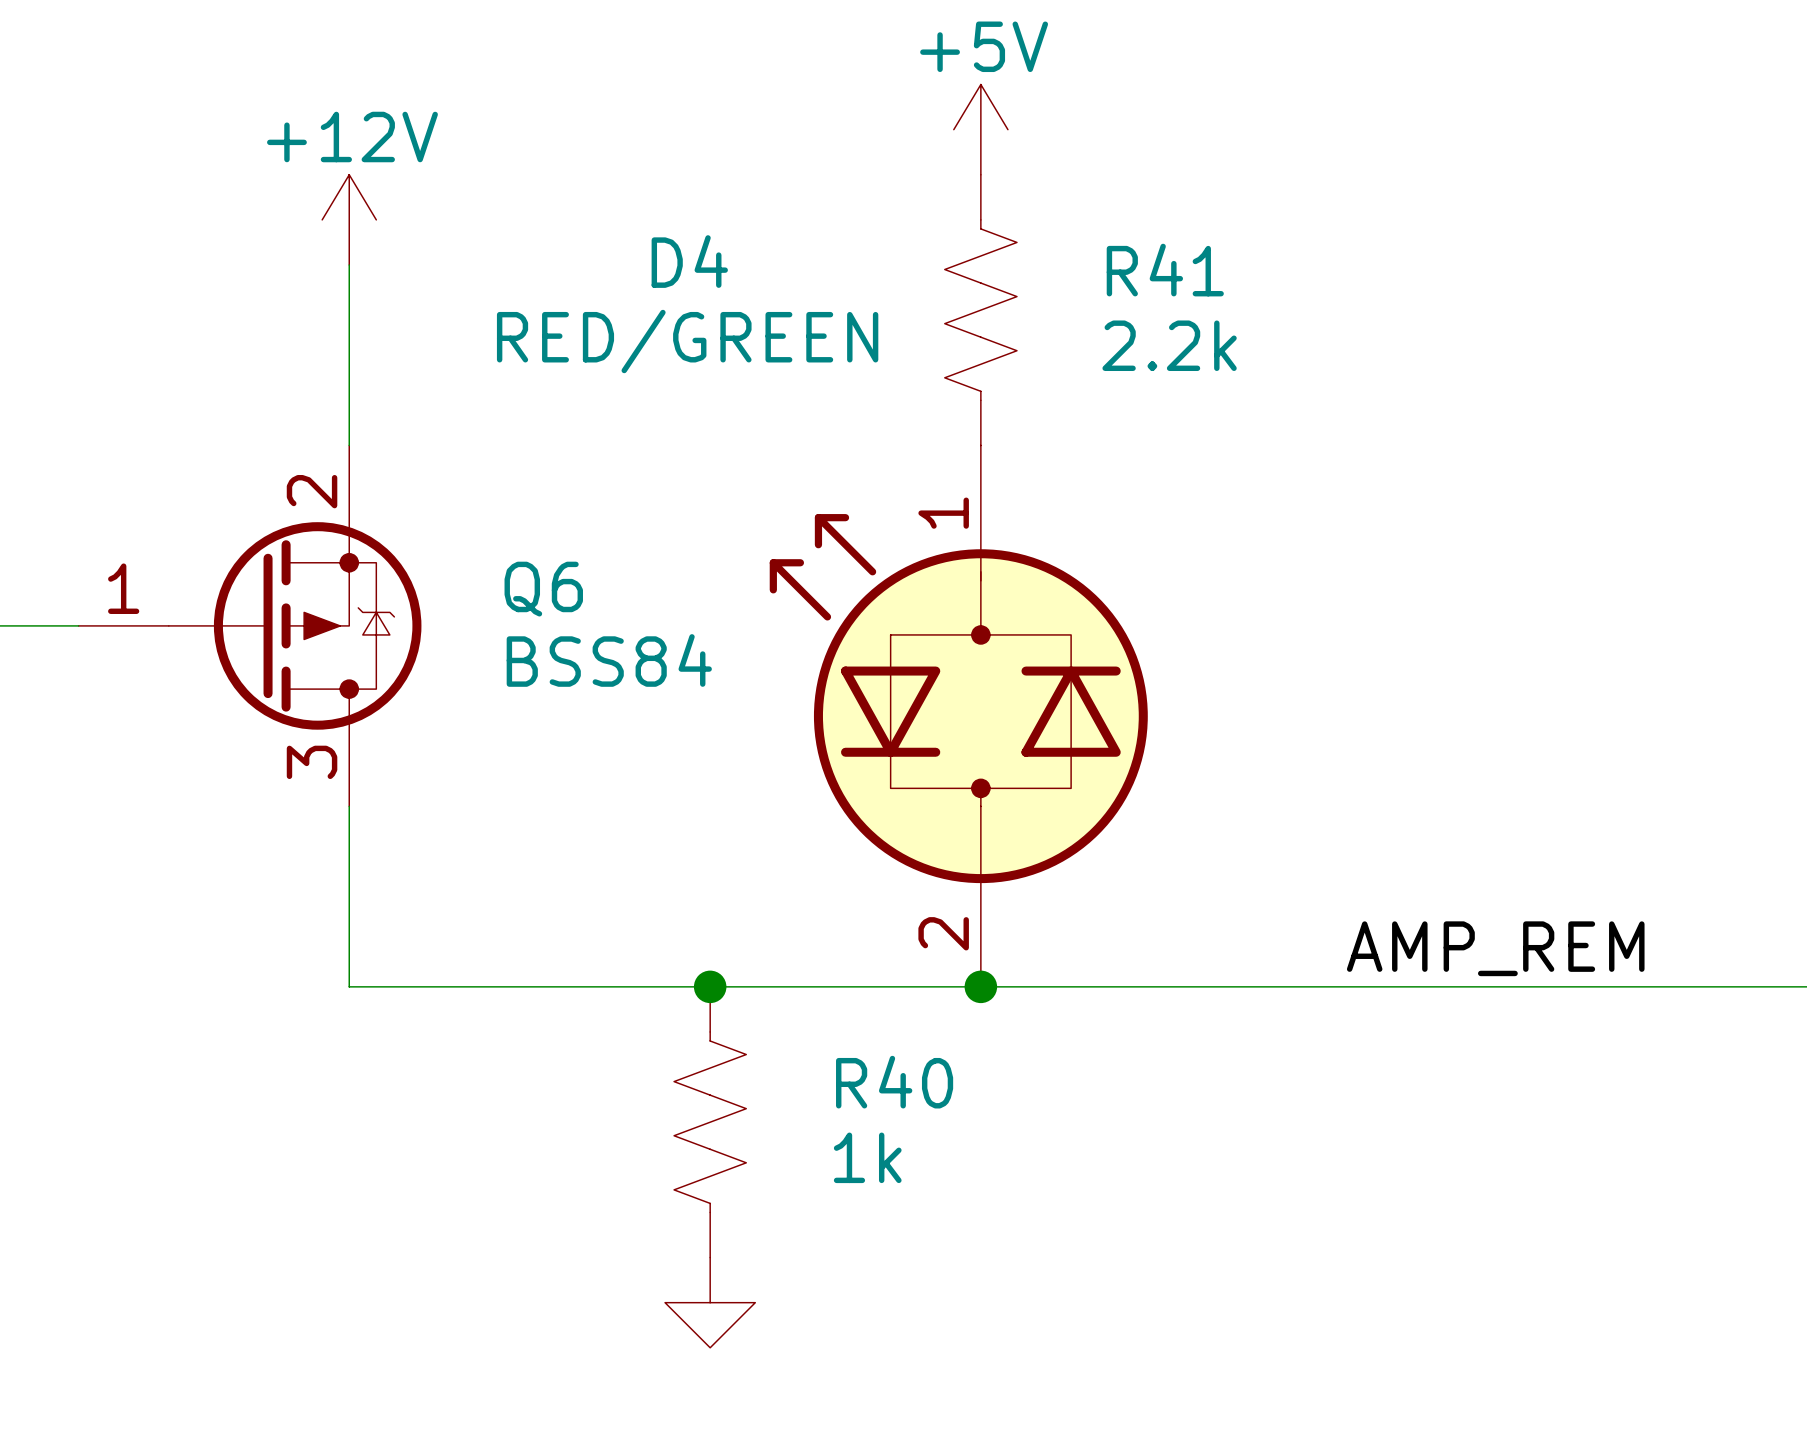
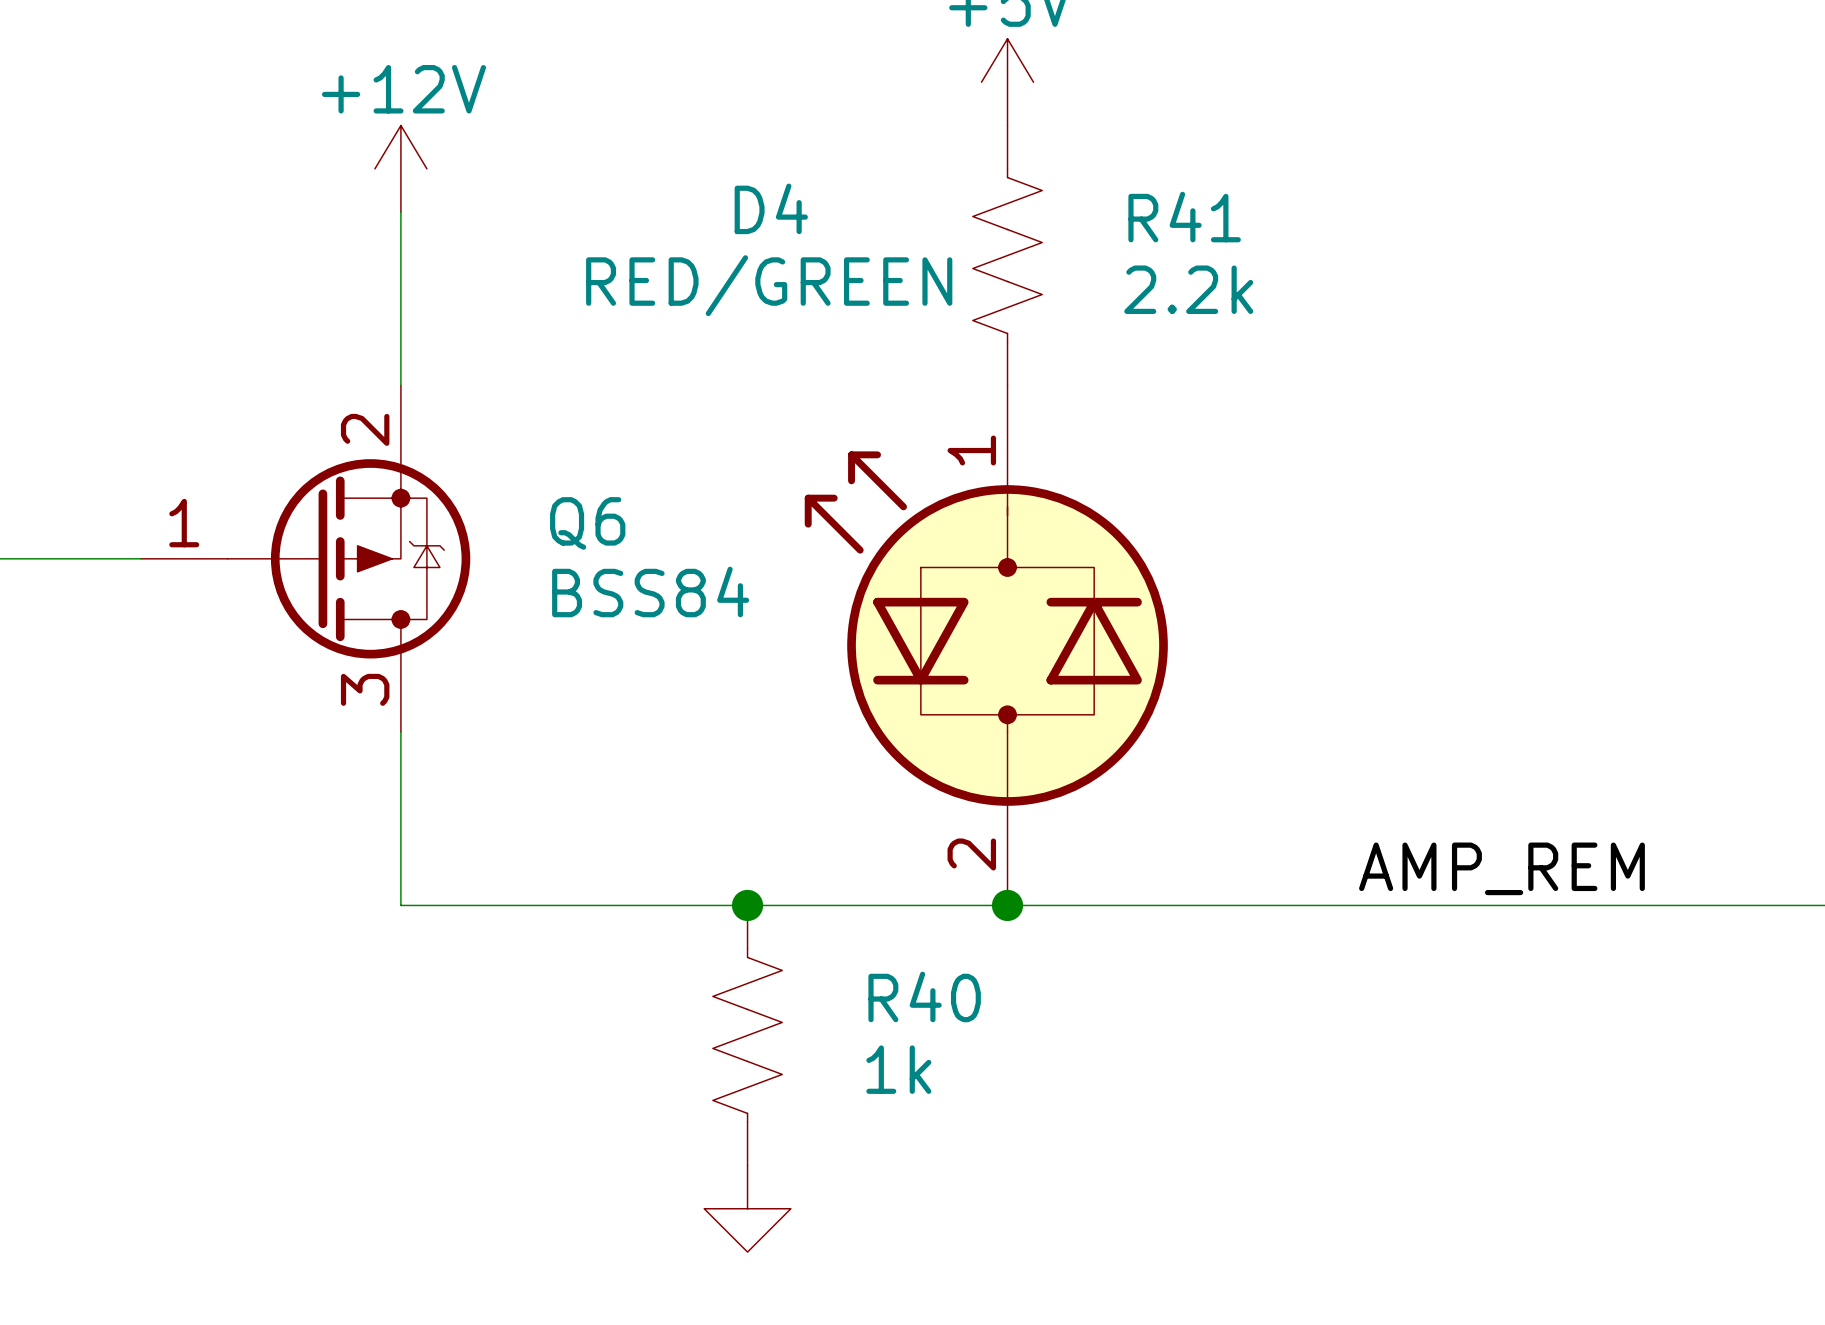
D4 name position: D4 (689, 261) -> D4 (771, 208)
D4 value position: RED/GREEN (687, 341) -> RED/GREEN (769, 285)

